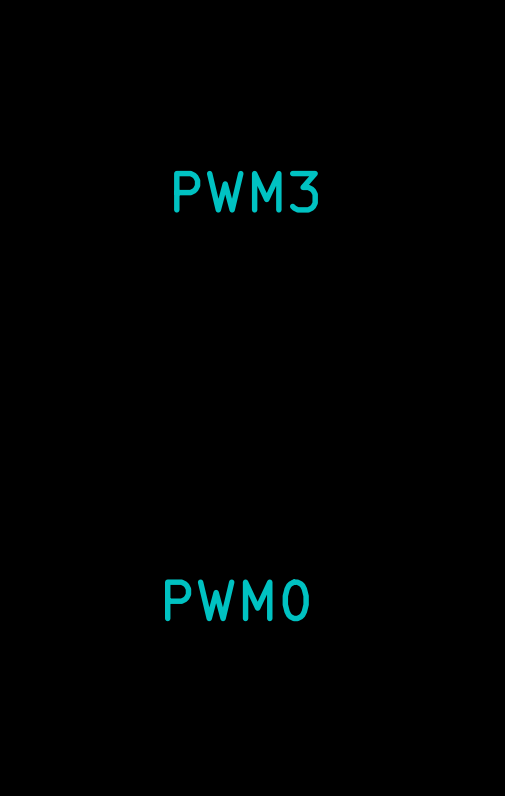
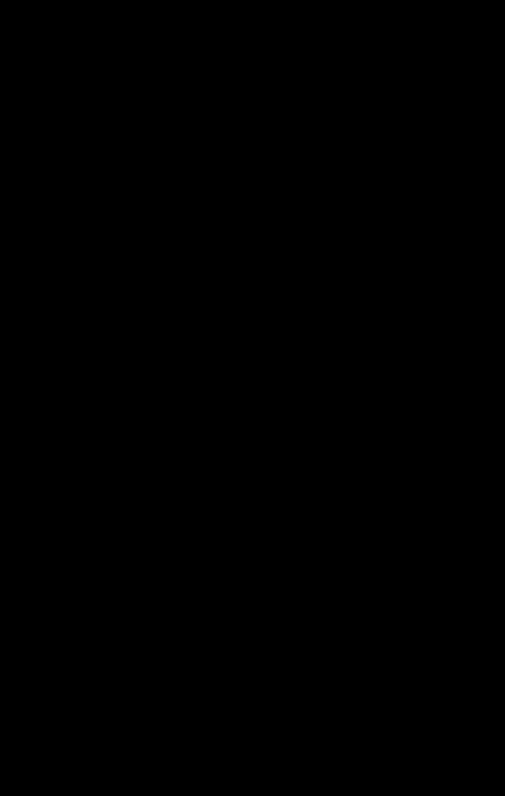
text: PWM3 (245, 191) -> none
text: PWM0 (236, 600) -> none

